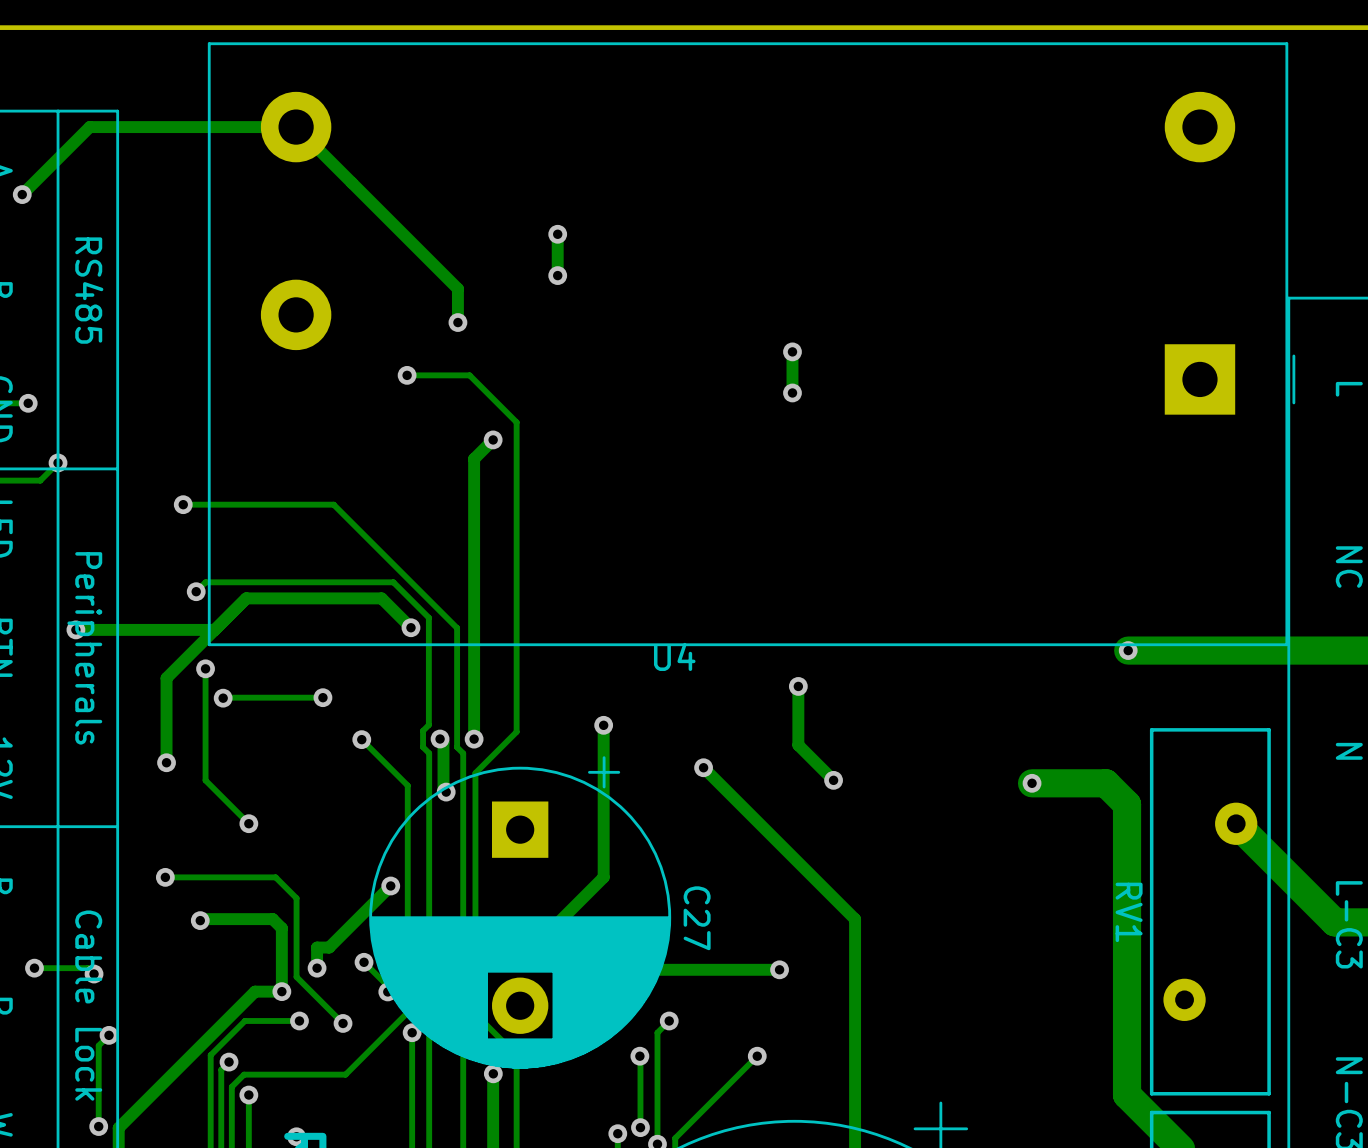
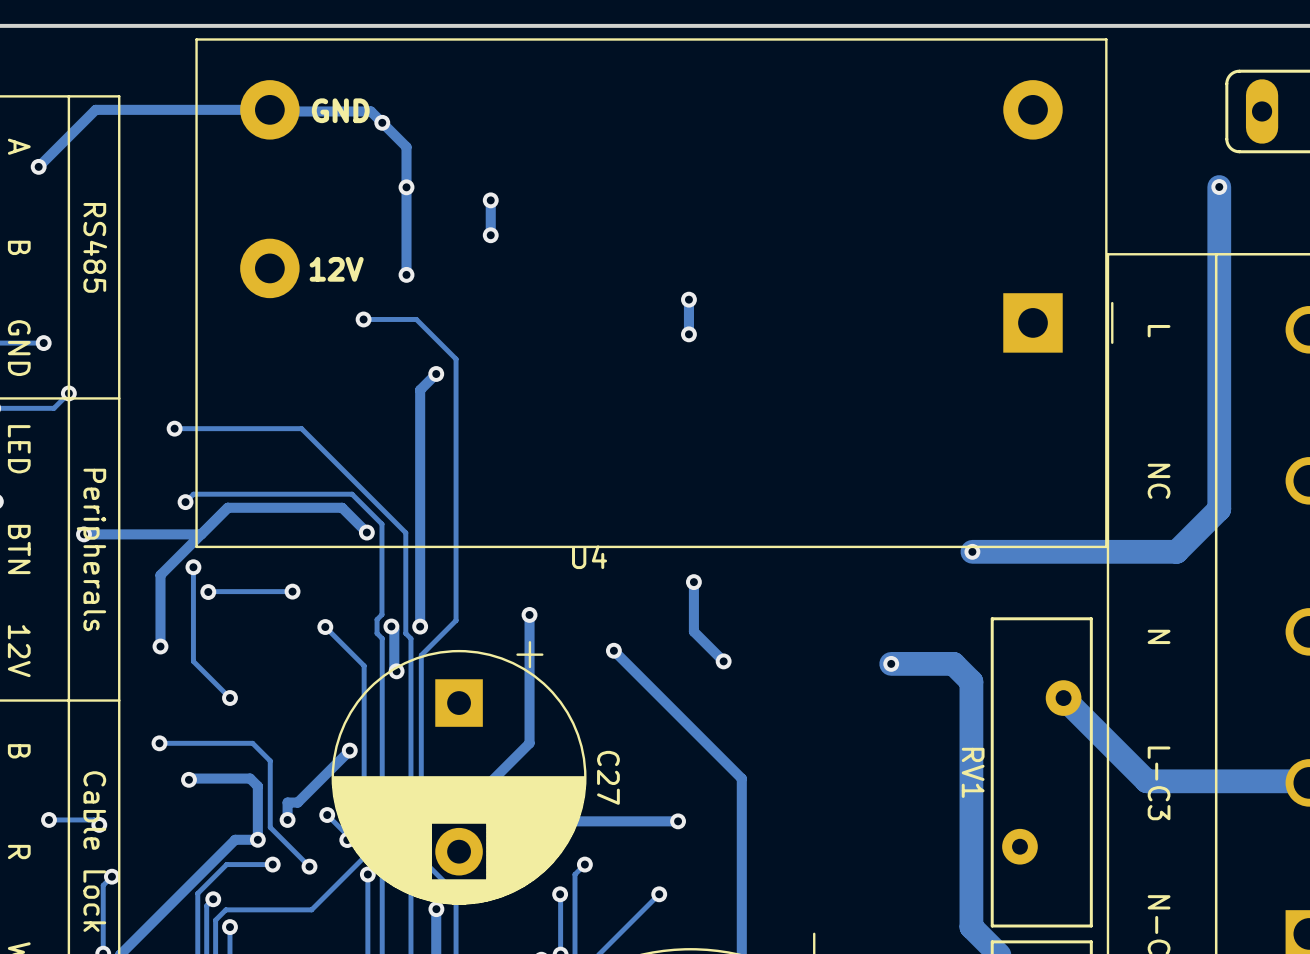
text: none -> GND (340, 110)
track: (298, 129) (457, 288) -> (271, 111) (370, 111) (406, 147) (406, 246)
via: none -> (382, 122)
via: none -> (406, 187)
text: none -> 12V (336, 269)

